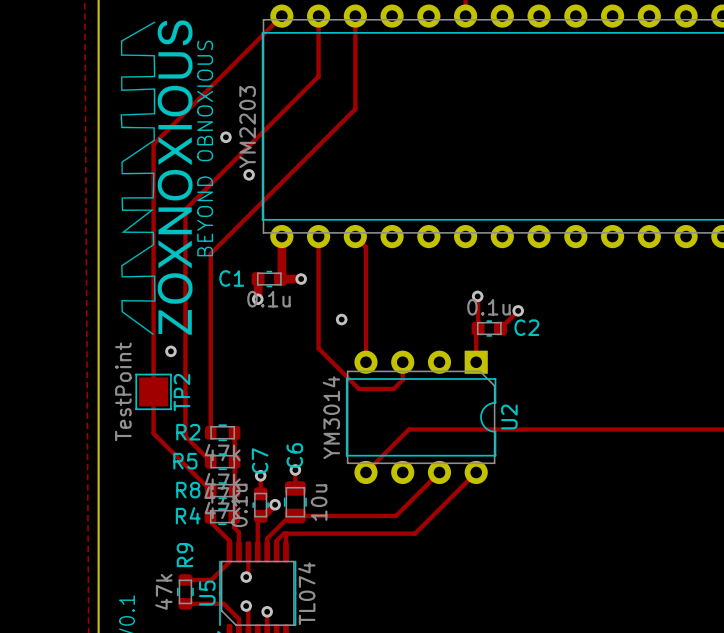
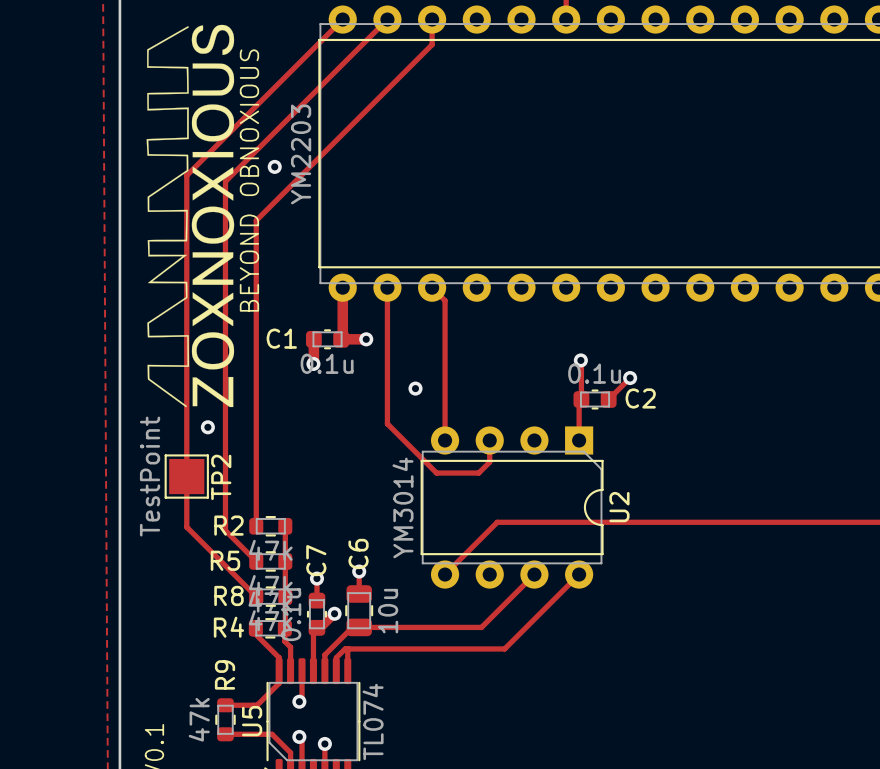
track: (318, 16) (318, 76) (185, 209) -> (387, 19) (225, 181) (225, 254)
track: (355, 36) (355, 109) (210, 253) -> (432, 44) (256, 220) (256, 308)
via: (249, 174) -> none

